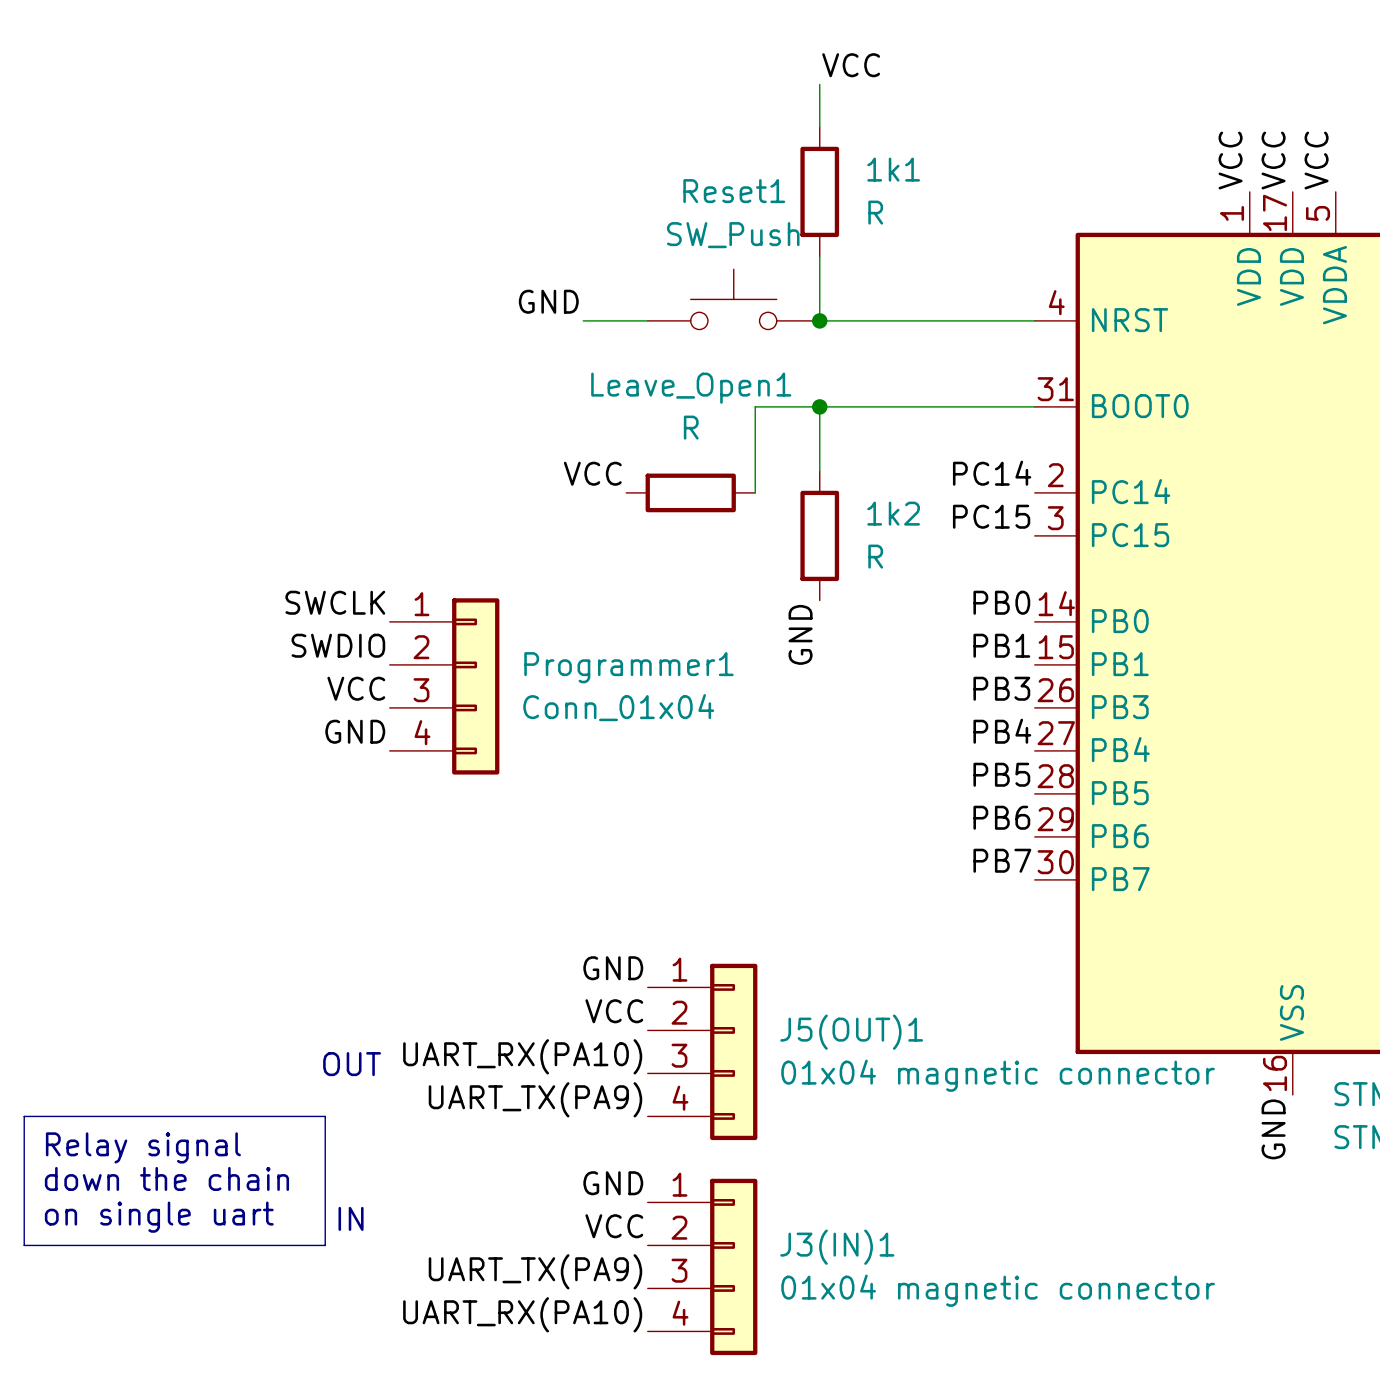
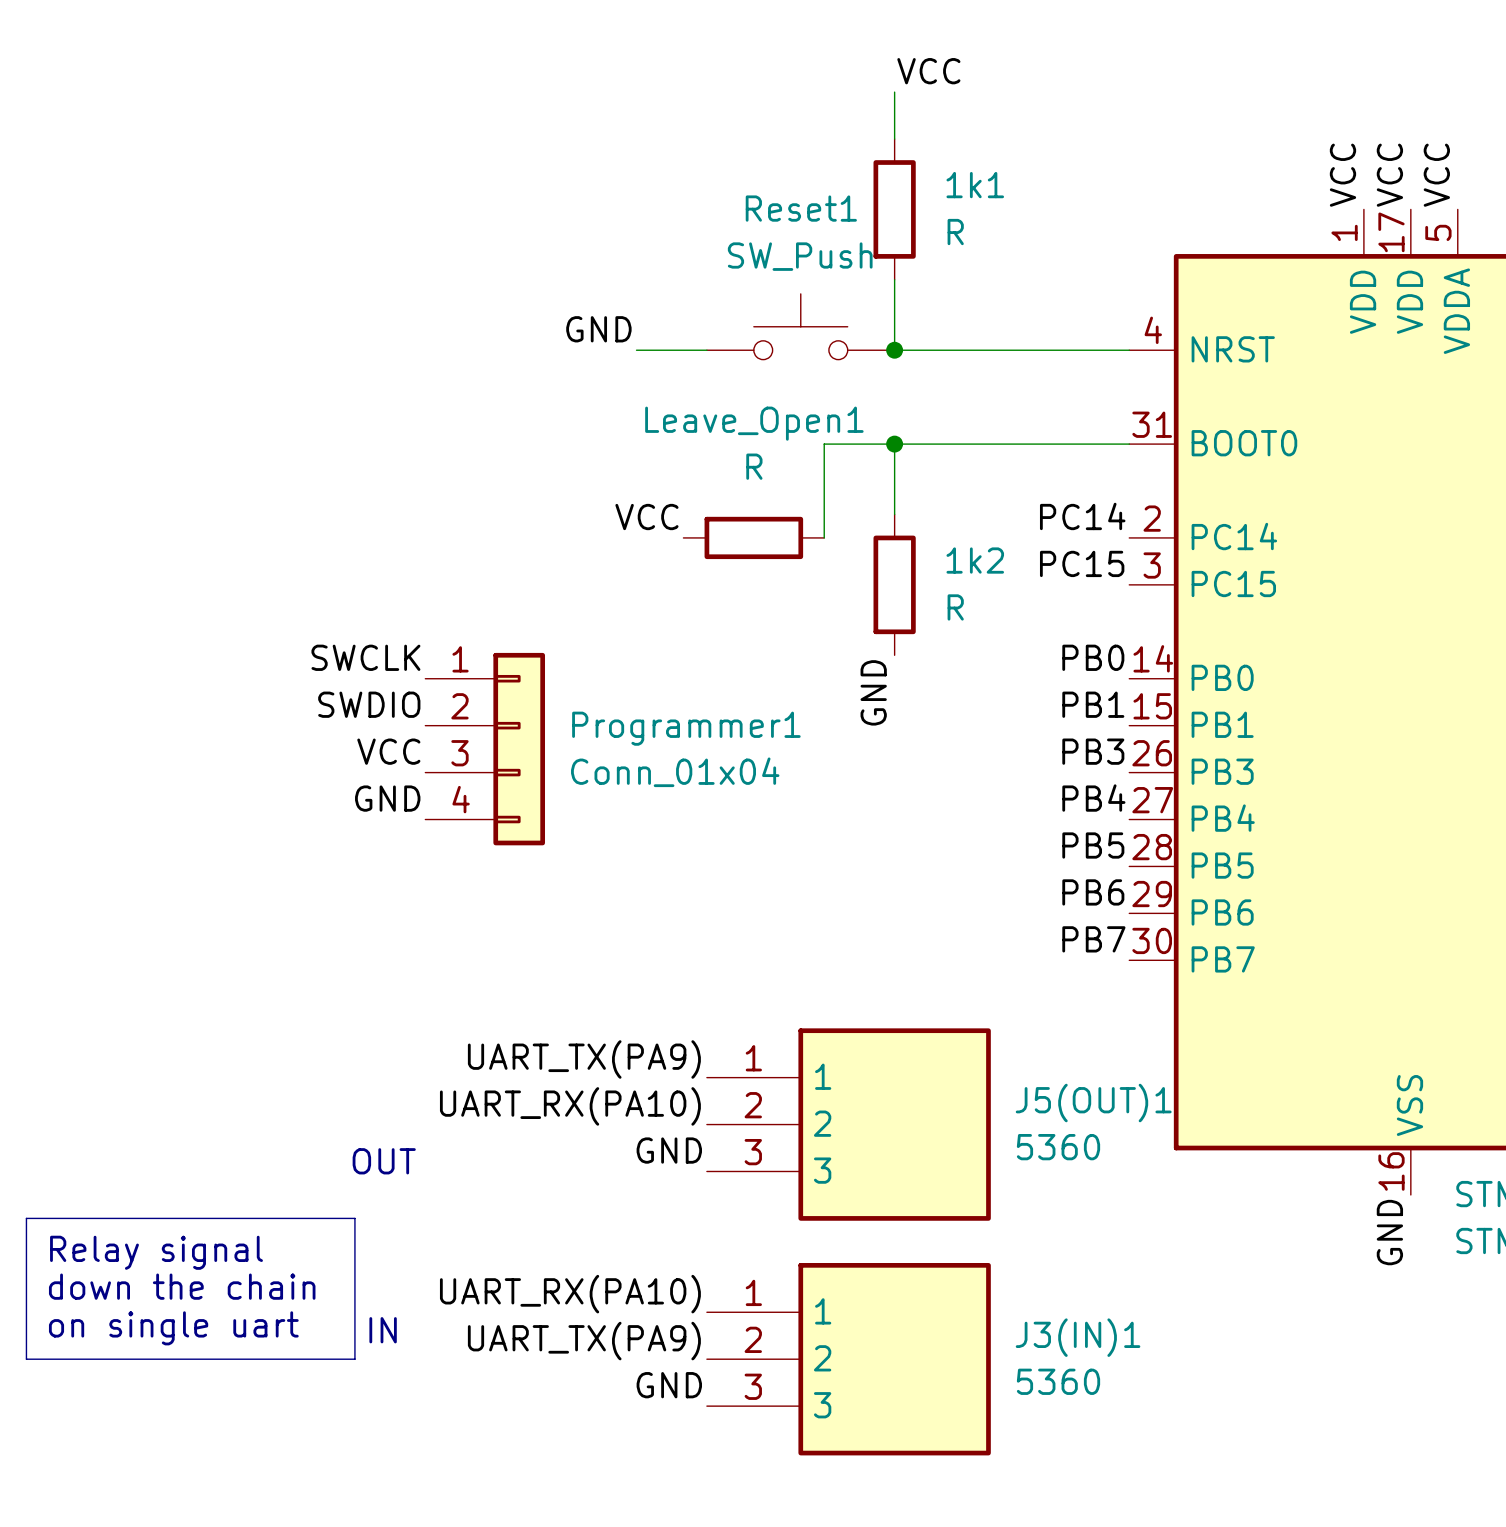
J5(OUT)1 symbol: [647, 963, 758, 1141] -> [706, 1028, 991, 1221]
label: GND (613, 968) -> UART_TX(PA9) (584, 1059)
label: VCC (614, 1011) -> UART_RX(PA10) (570, 1106)
J5(OUT)1 name position: J5(OUT)1 (851, 1032) -> J5(OUT)1 (1093, 1103)
label: UART_RX(PA10) (522, 1056) -> GND (669, 1150)
J5(OUT)1 value: 01x04 magnetic connector (998, 1075) -> 5360 (1058, 1147)
label: UART_TX(PA9) (535, 1099) -> none
J3(IN)1 symbol: [647, 1178, 758, 1356] -> [706, 1262, 991, 1456]
label: GND (613, 1183) -> UART_RX(PA10) (570, 1294)
label: VCC (614, 1226) -> UART_TX(PA9) (584, 1341)
J3(IN)1 name position: J3(IN)1 (837, 1247) -> J3(IN)1 (1078, 1337)
label: UART_TX(PA9) (535, 1271) -> GND (669, 1385)
J3(IN)1 value: 01x04 magnetic connector (998, 1290) -> 5360 (1058, 1381)
label: UART_RX(PA10) (522, 1314) -> none

